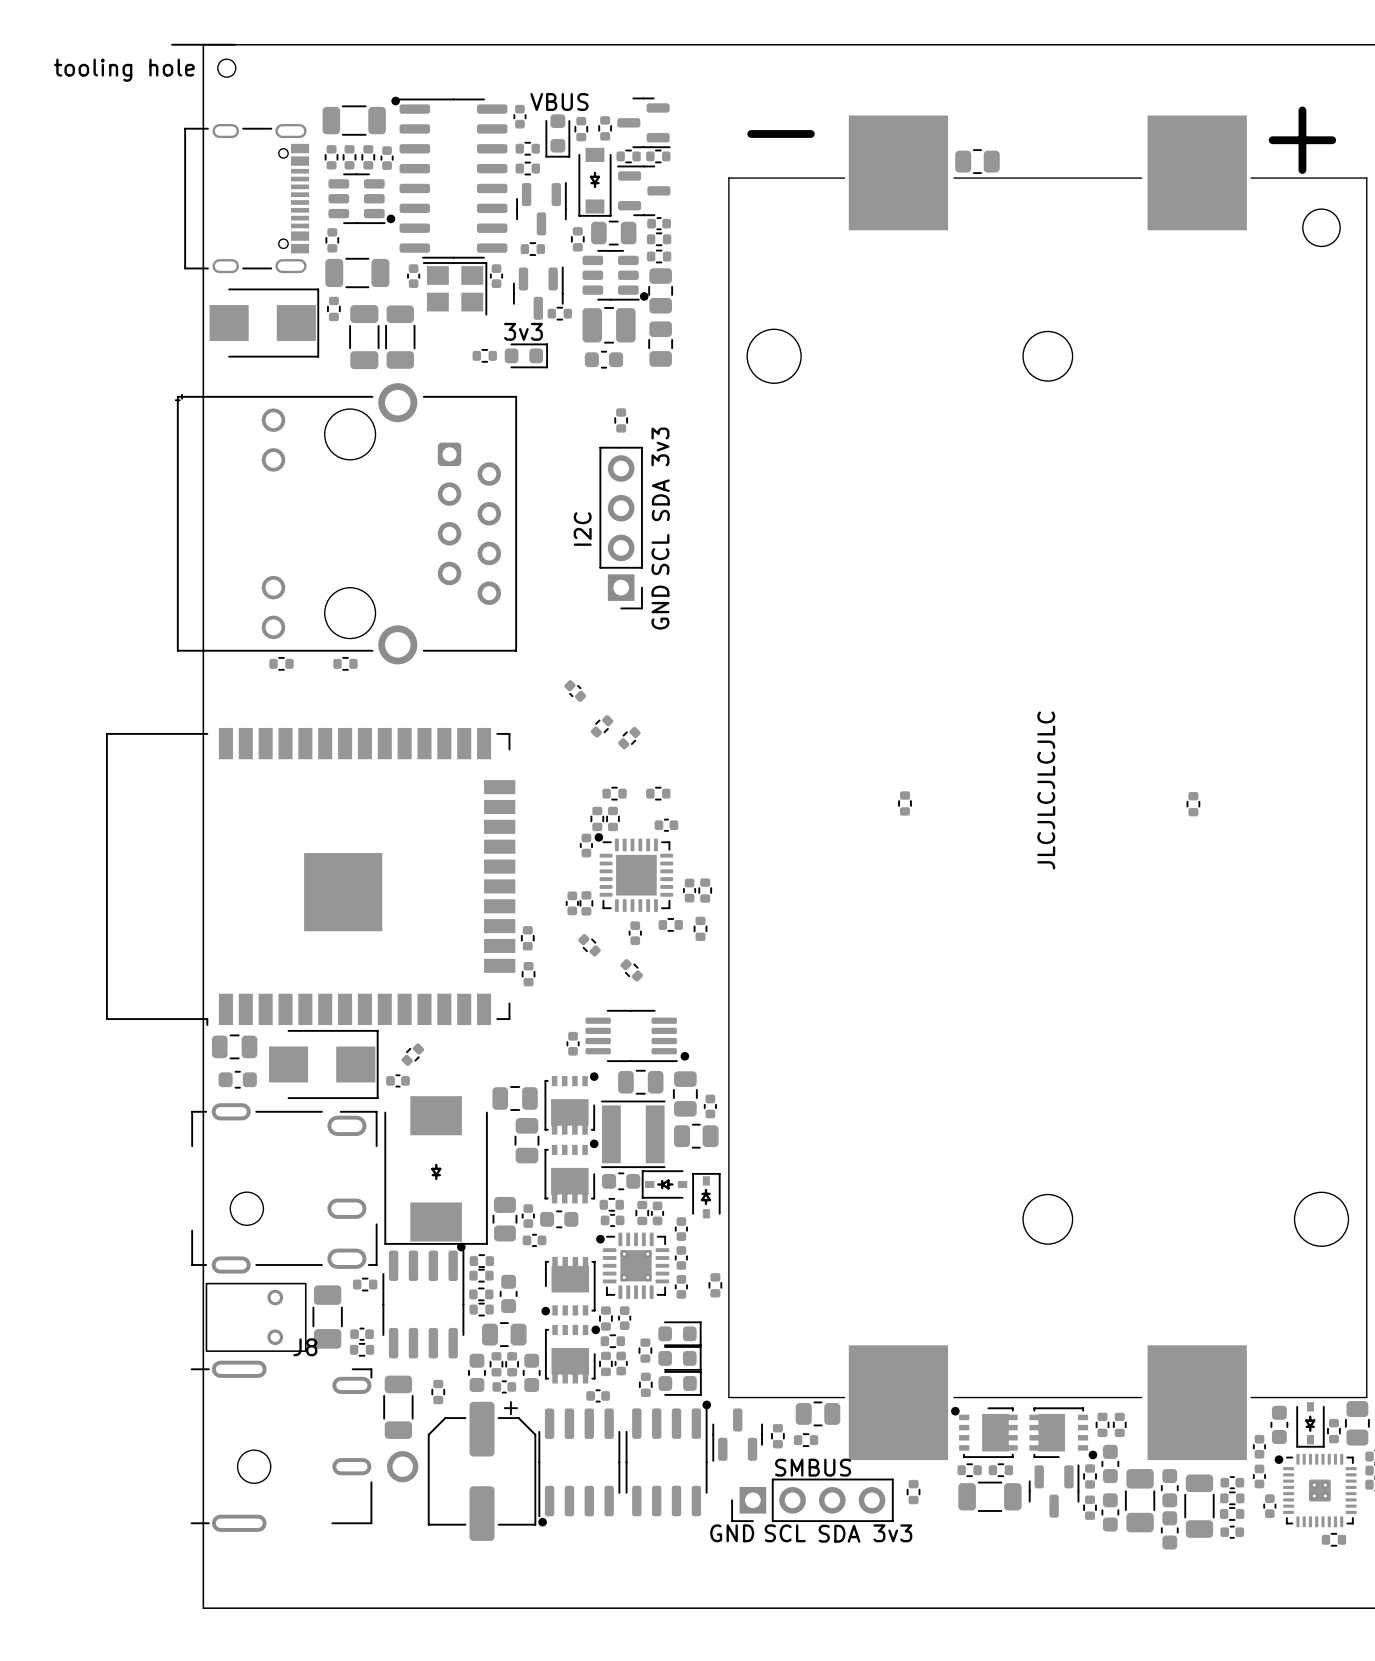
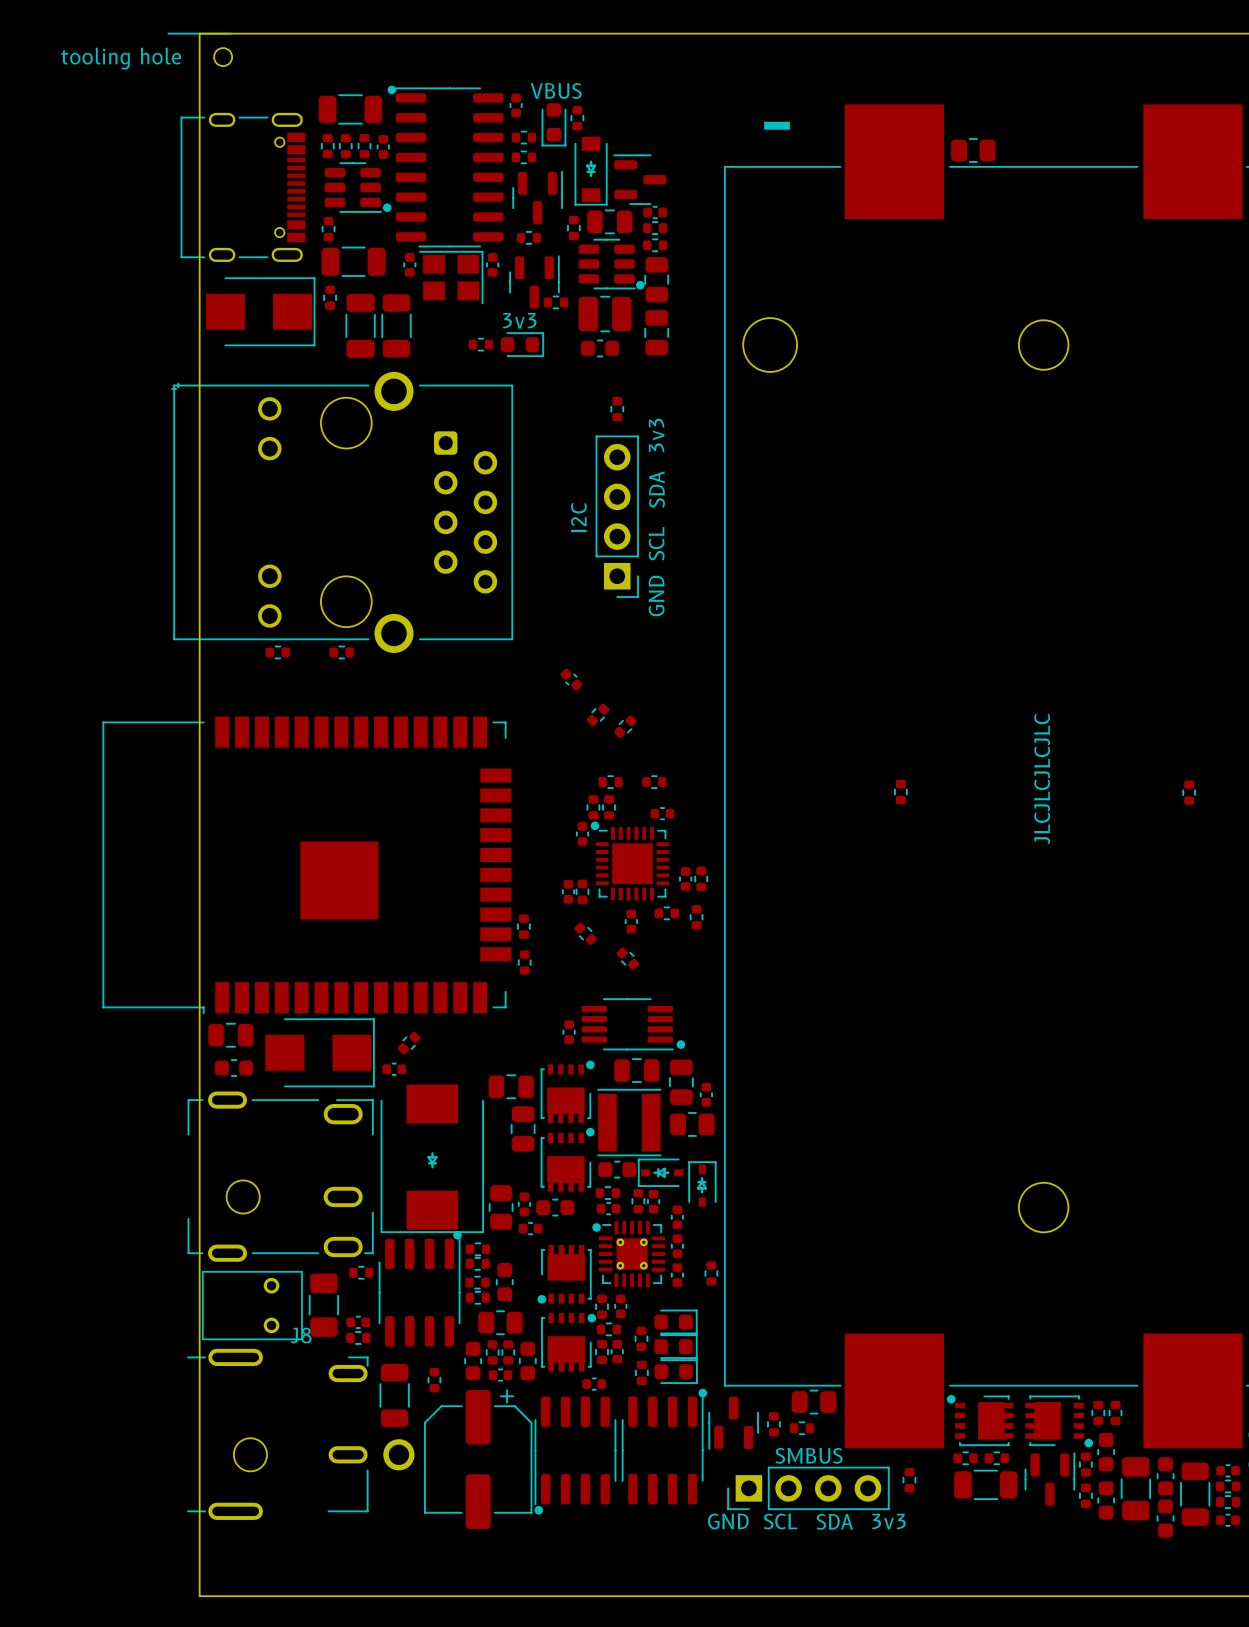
part: (643, 122) -> none
part: (605, 128) -> none
part: (628, 156) -> none
part: (658, 156) -> none

